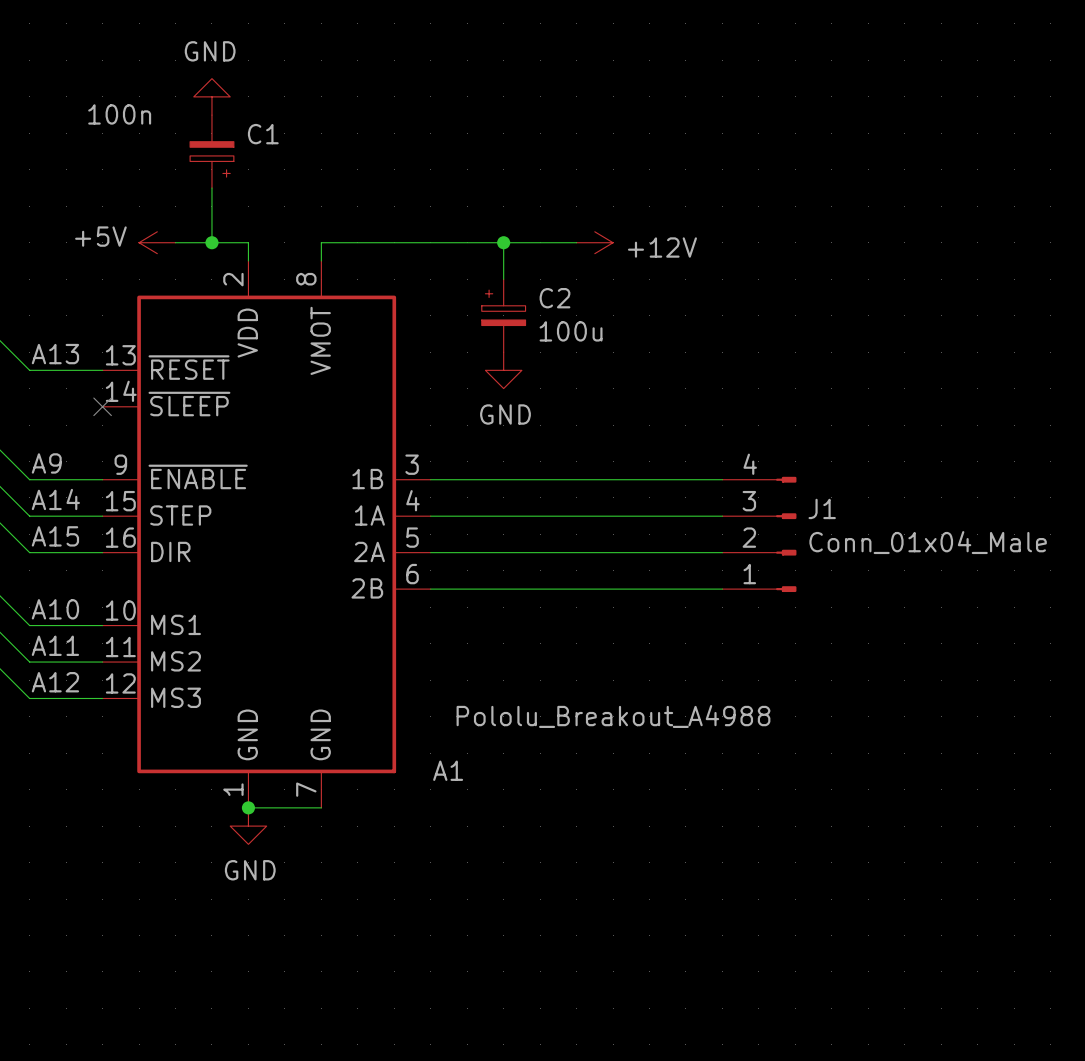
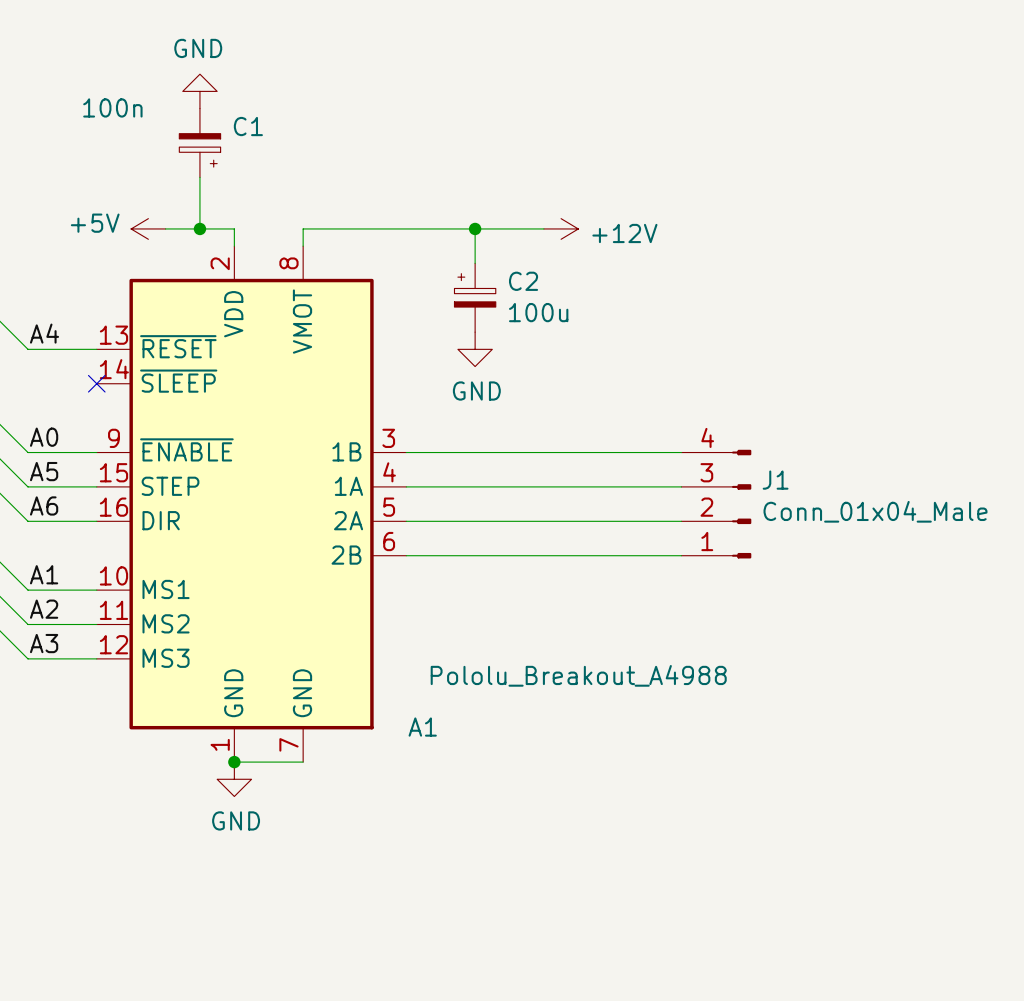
label: A13 (55, 354) -> A4 (44, 333)
label: A9 (46, 463) -> A0 (44, 437)
label: A14 (55, 499) -> A5 (44, 471)
label: A15 (55, 536) -> A6 (44, 505)
label: A10 (55, 609) -> A1 (44, 574)
label: A11 (55, 645) -> A2 (44, 609)
label: A12 (55, 682) -> A3 (44, 643)

